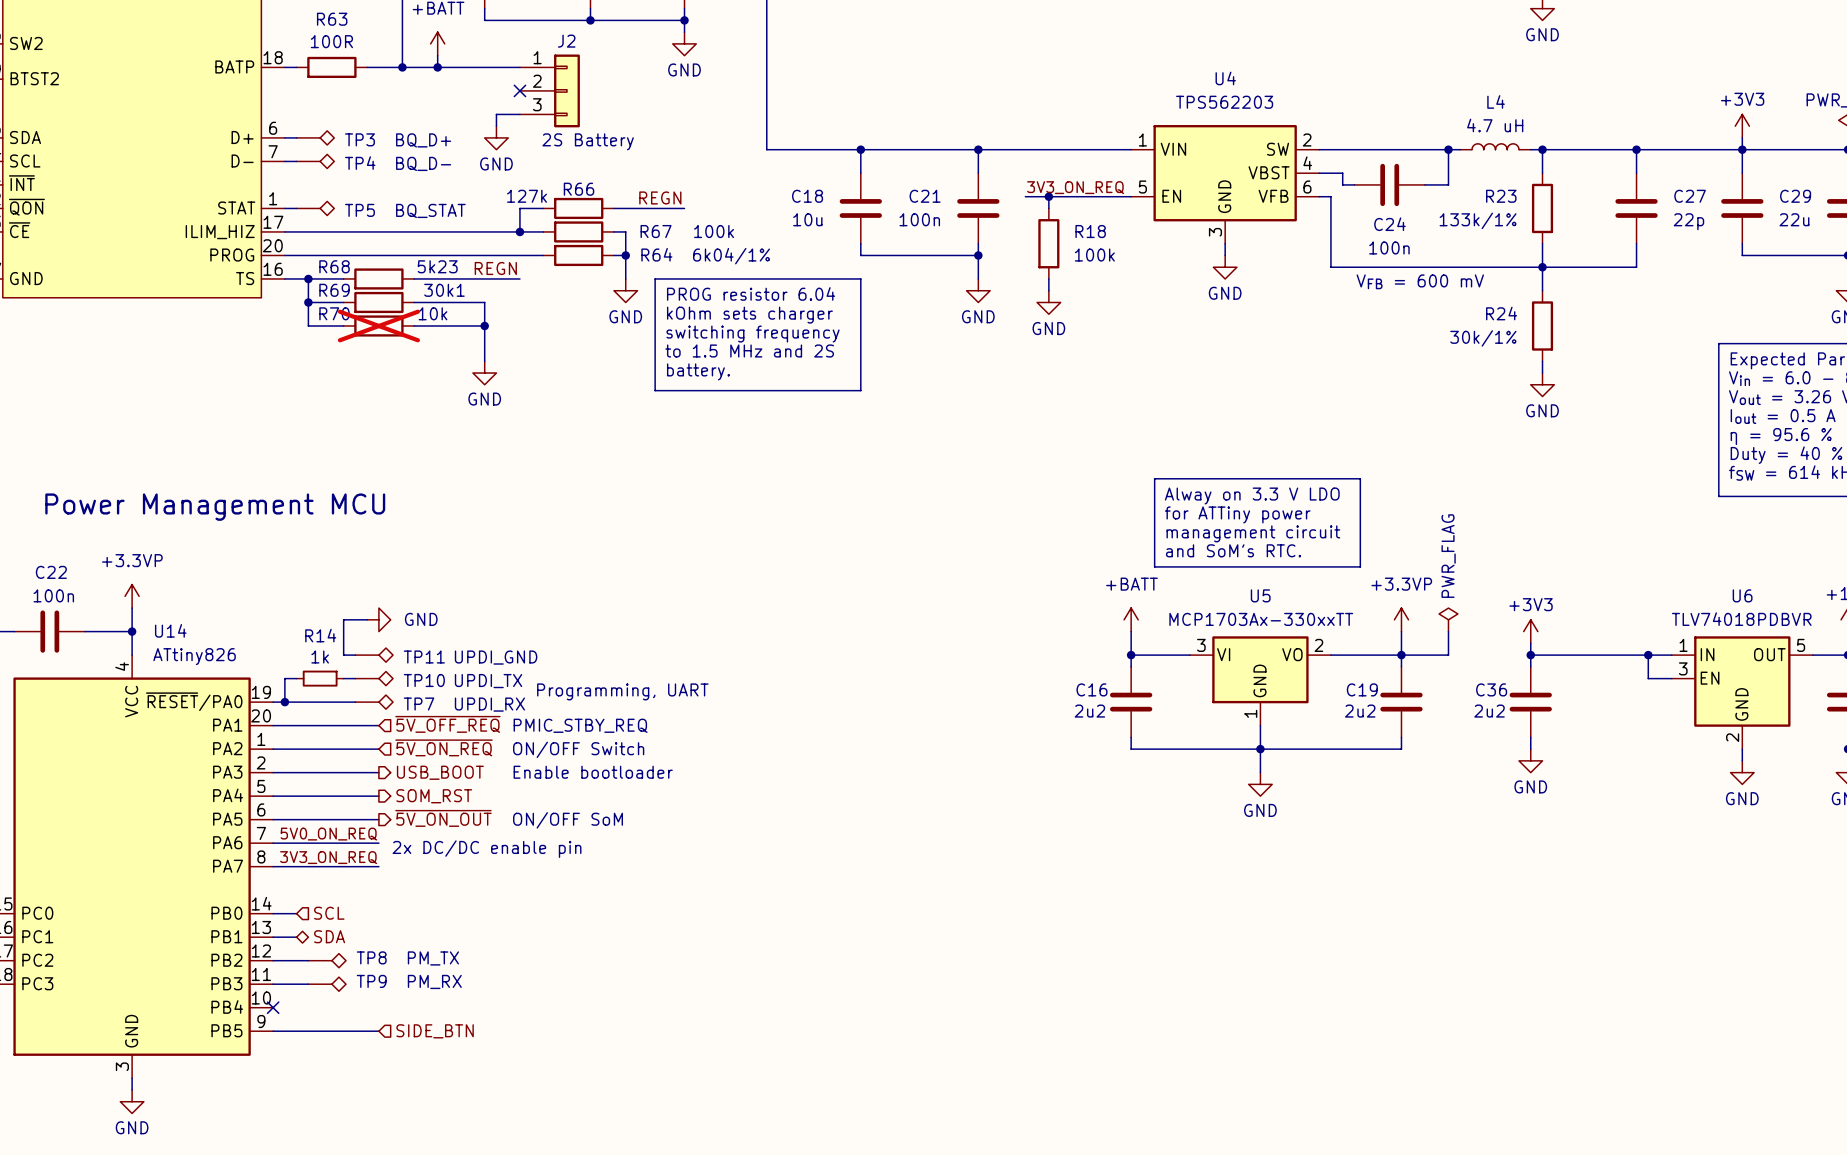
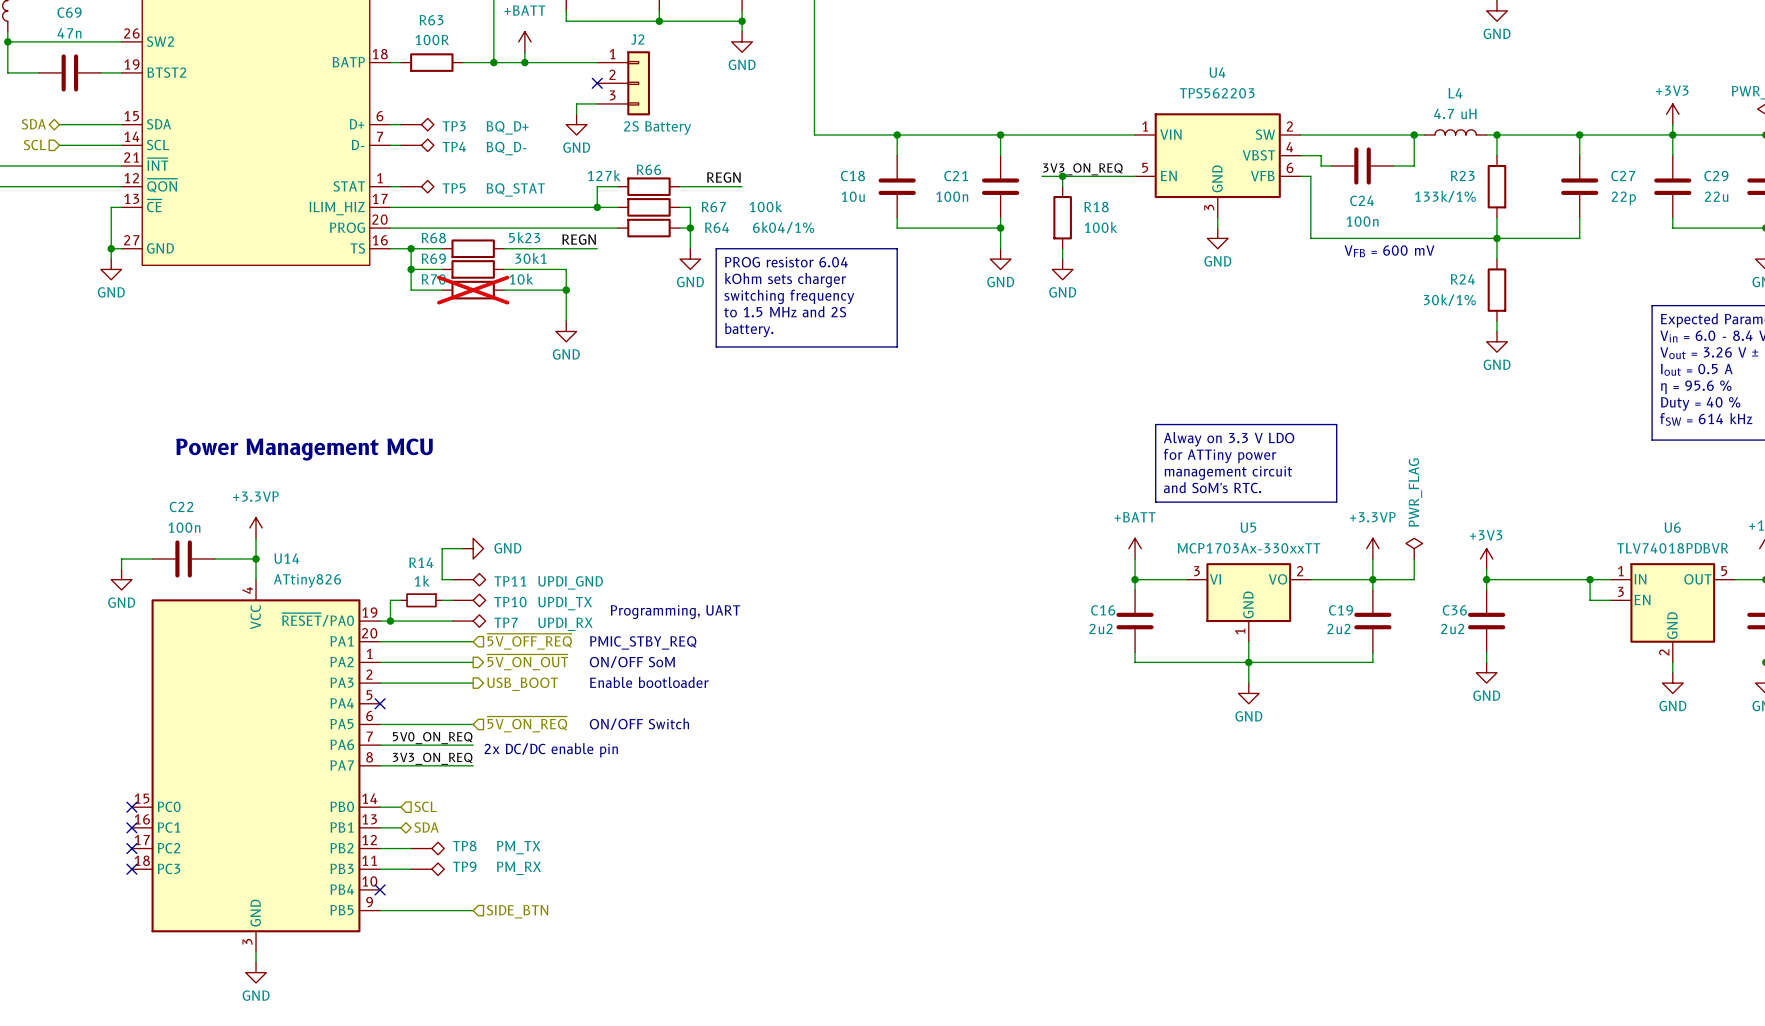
hierarchical label shape: input (444, 747) -> output (527, 662)
hierarchical label: ~{5V_ON_REQ} (444, 747) -> ~{5V_ON_OUT} (527, 662)
text: ON/OFF Switch (578, 749) -> ON/OFF SoM (632, 662)
wire: (273, 796) (378, 796) -> none
no-connect mark: none -> (380, 703)
hierarchical label: SOM_RST (434, 796) -> none
hierarchical label shape: output (443, 818) -> input (527, 724)
hierarchical label: ~{5V_ON_OUT} (443, 818) -> ~{5V_ON_REQ} (527, 724)
text: ON/OFF SoM (568, 820) -> ON/OFF Switch (639, 724)

